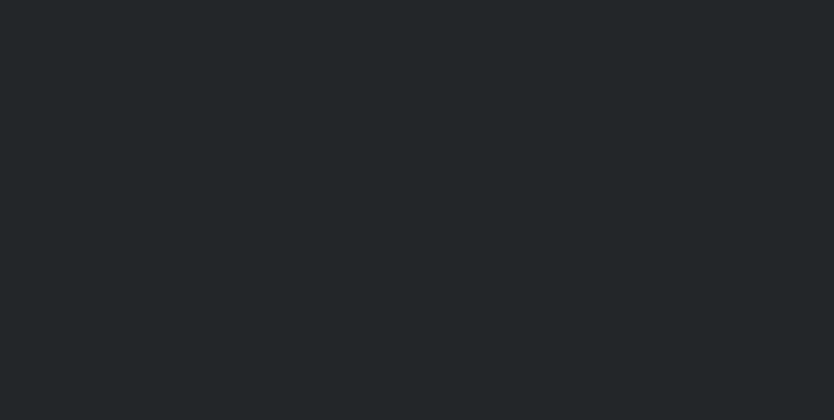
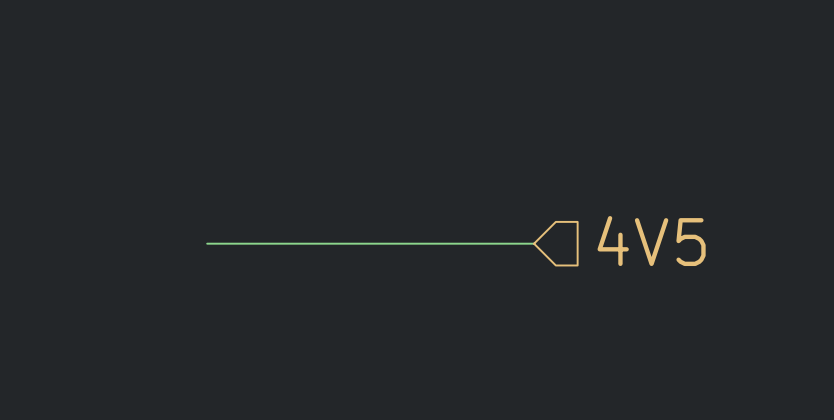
hierarchical label: none -> 4V5 (651, 241)
wire: none -> (207, 243) (534, 243)

